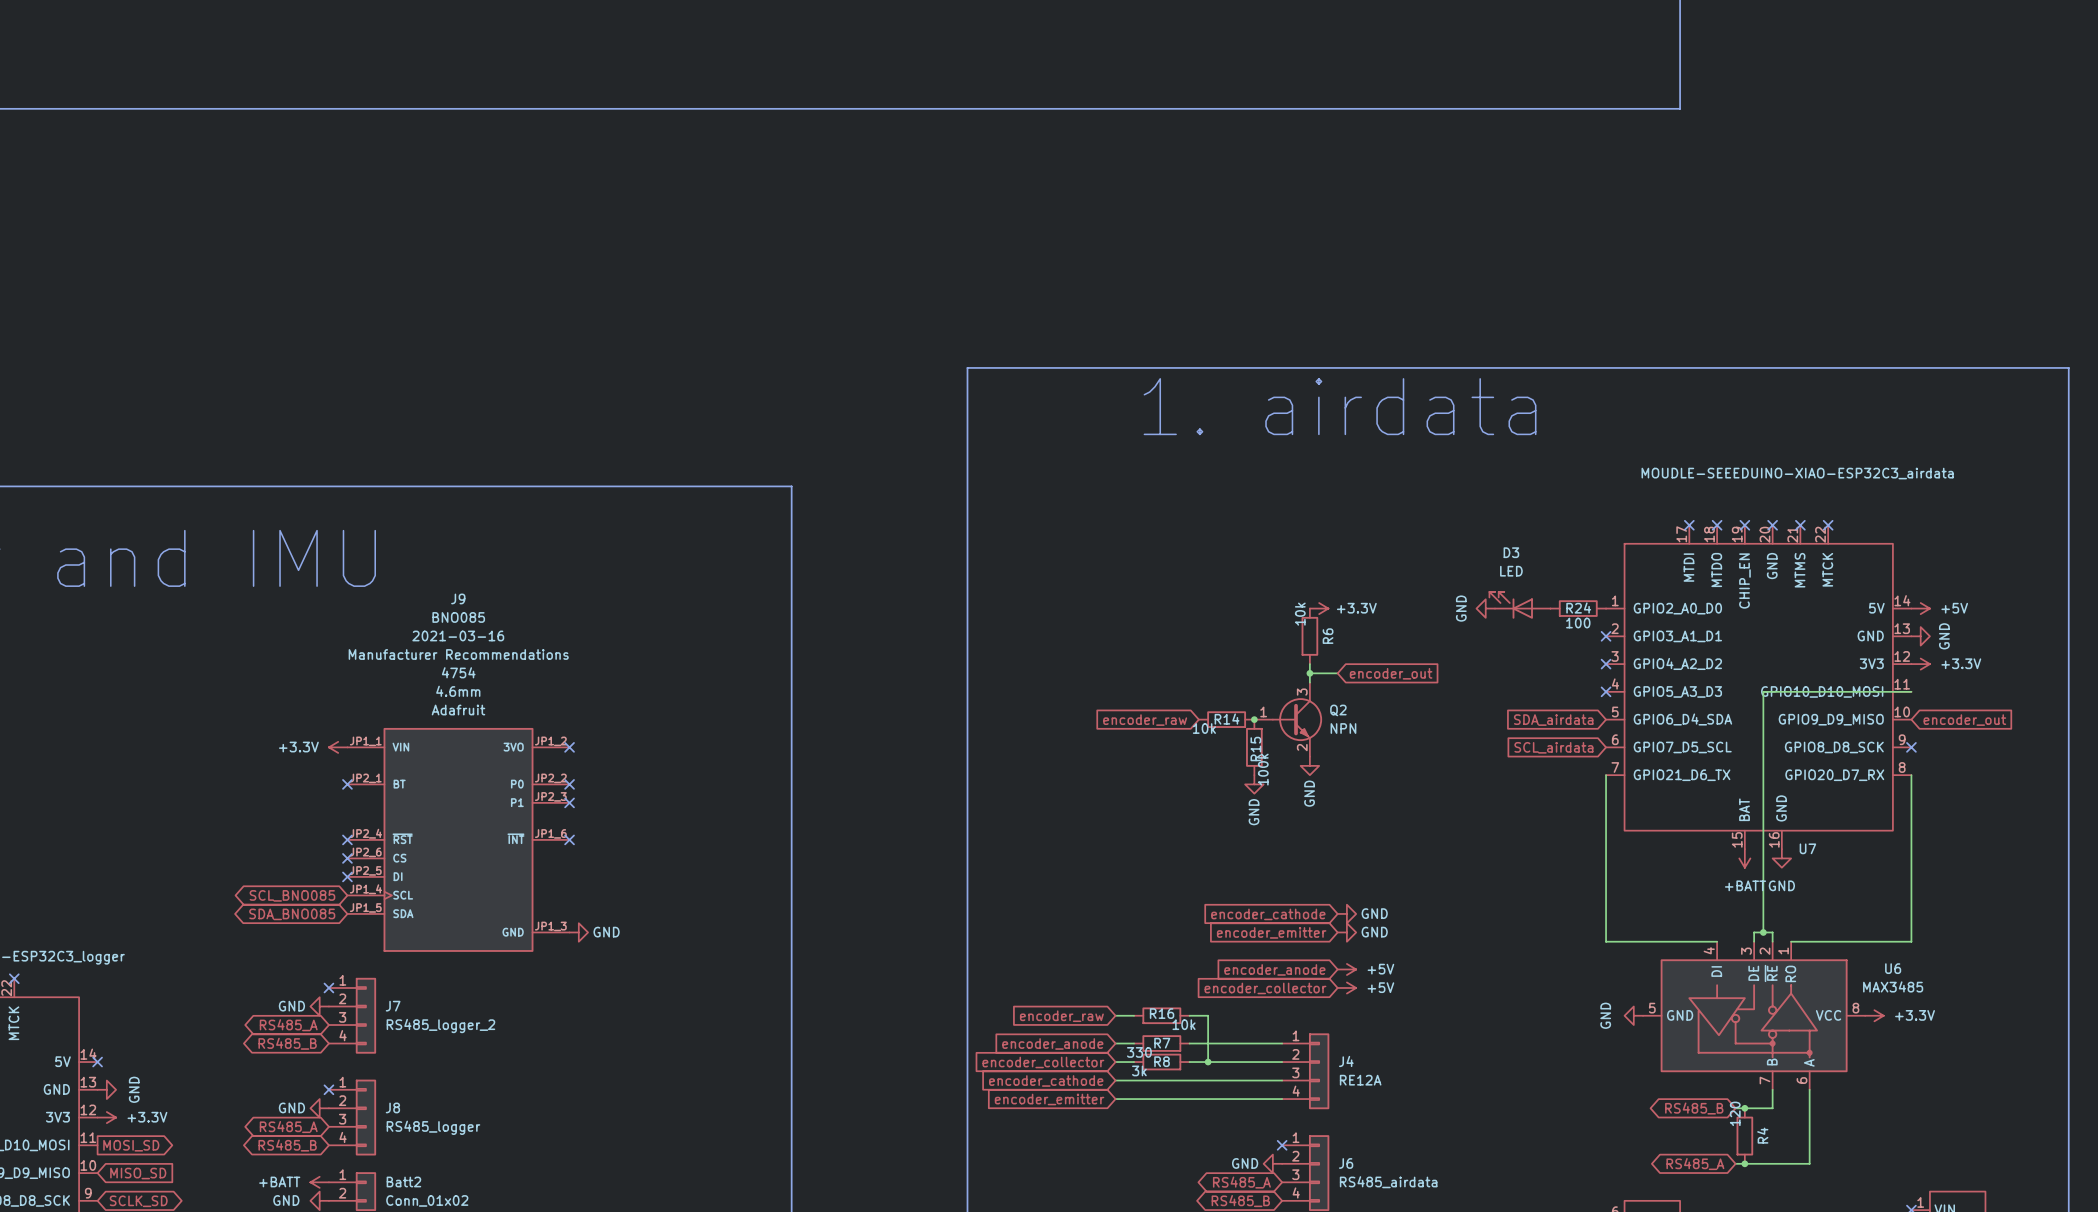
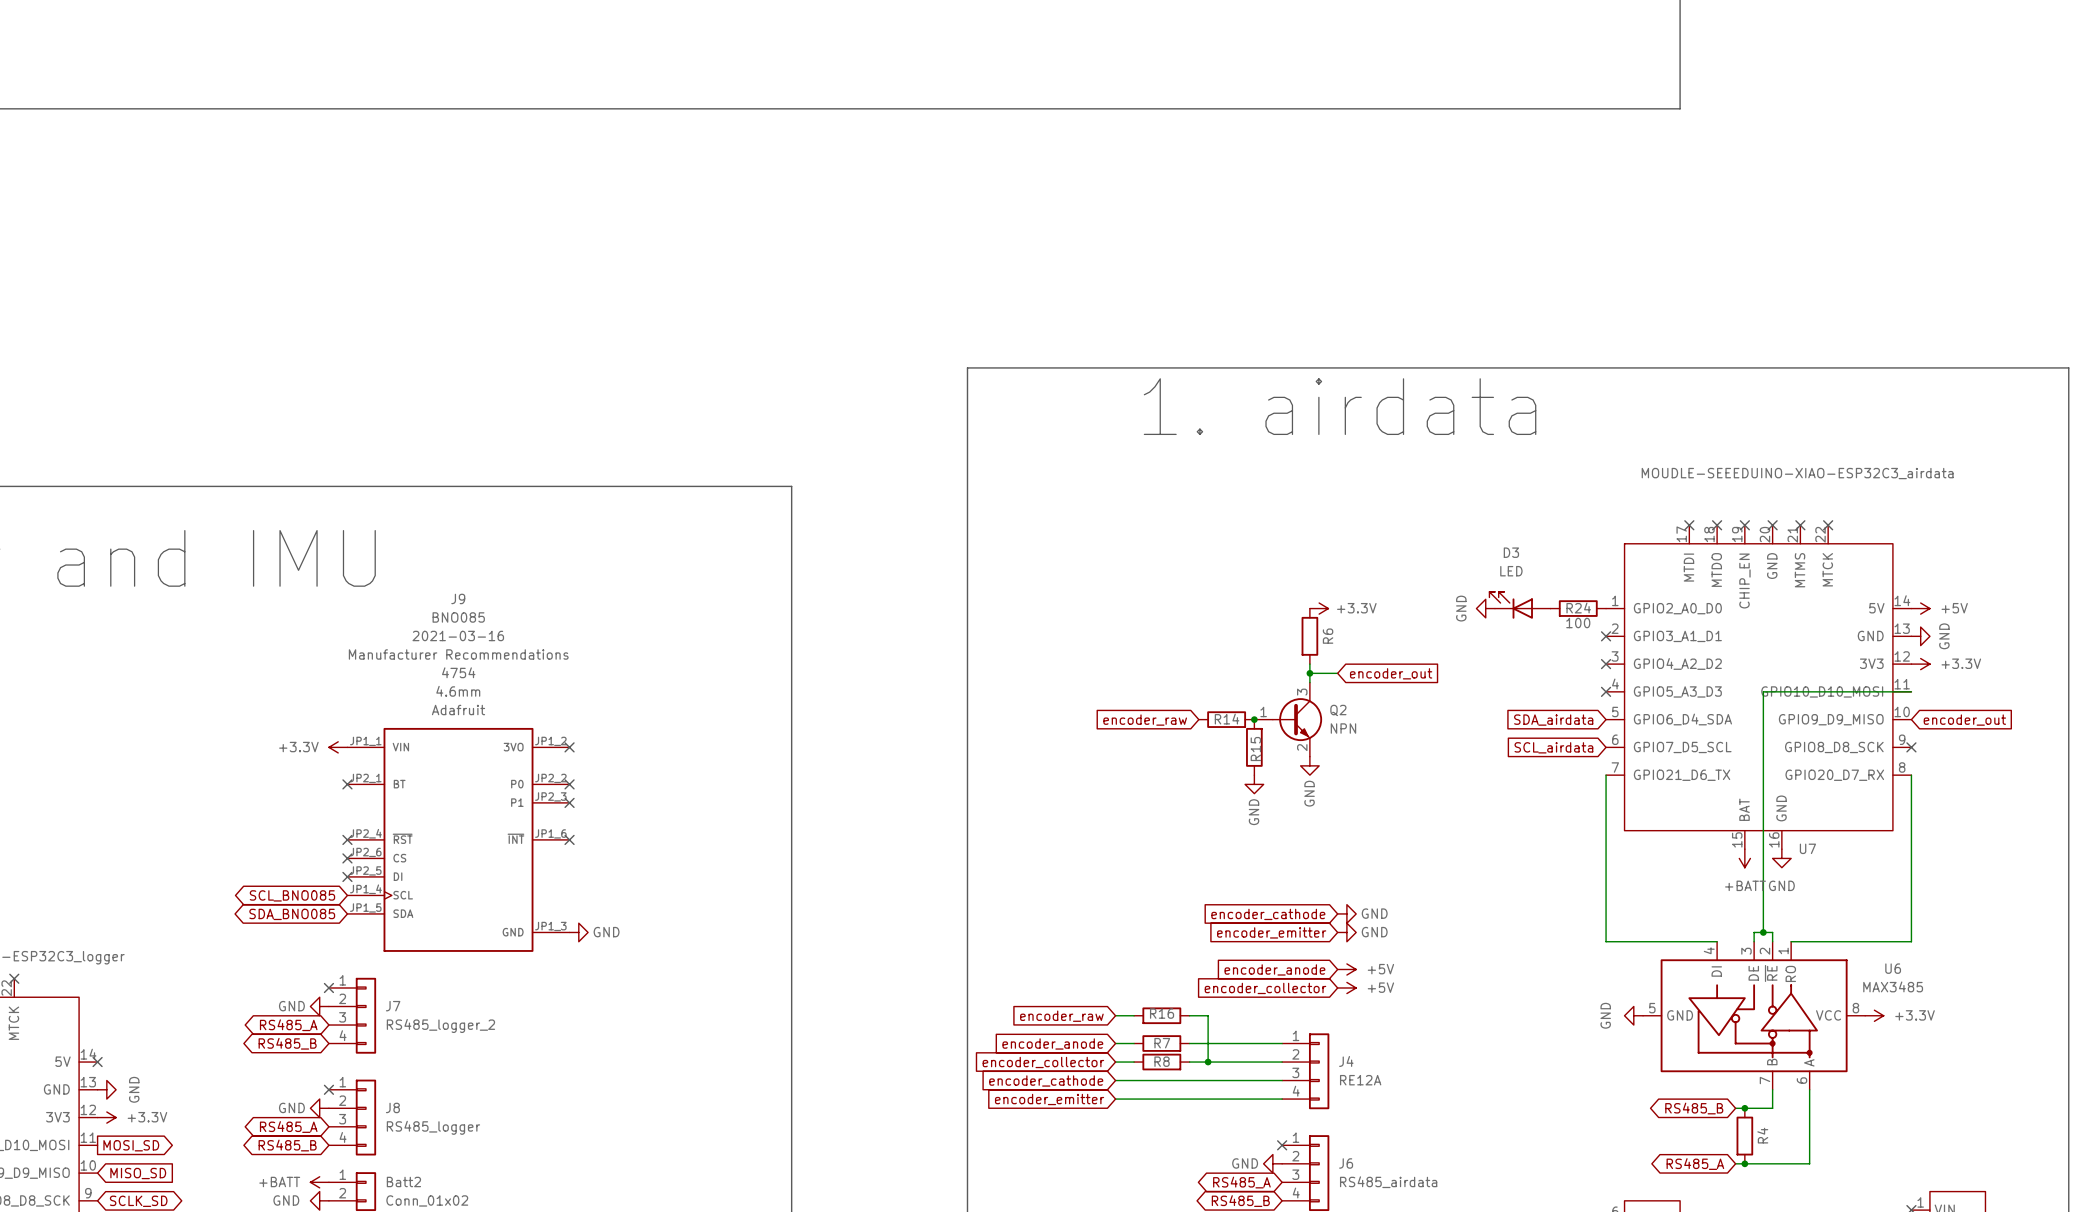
R6 value: 10k (1300, 614) -> none
R14 value: 10k (1204, 728) -> none
R15 value: 100k (1263, 769) -> none
R16 value: 10k (1184, 1024) -> none
R7 value: 330 (1139, 1052) -> none
R8 value: 3k (1139, 1070) -> none
R4 value: 120 (1735, 1113) -> none

